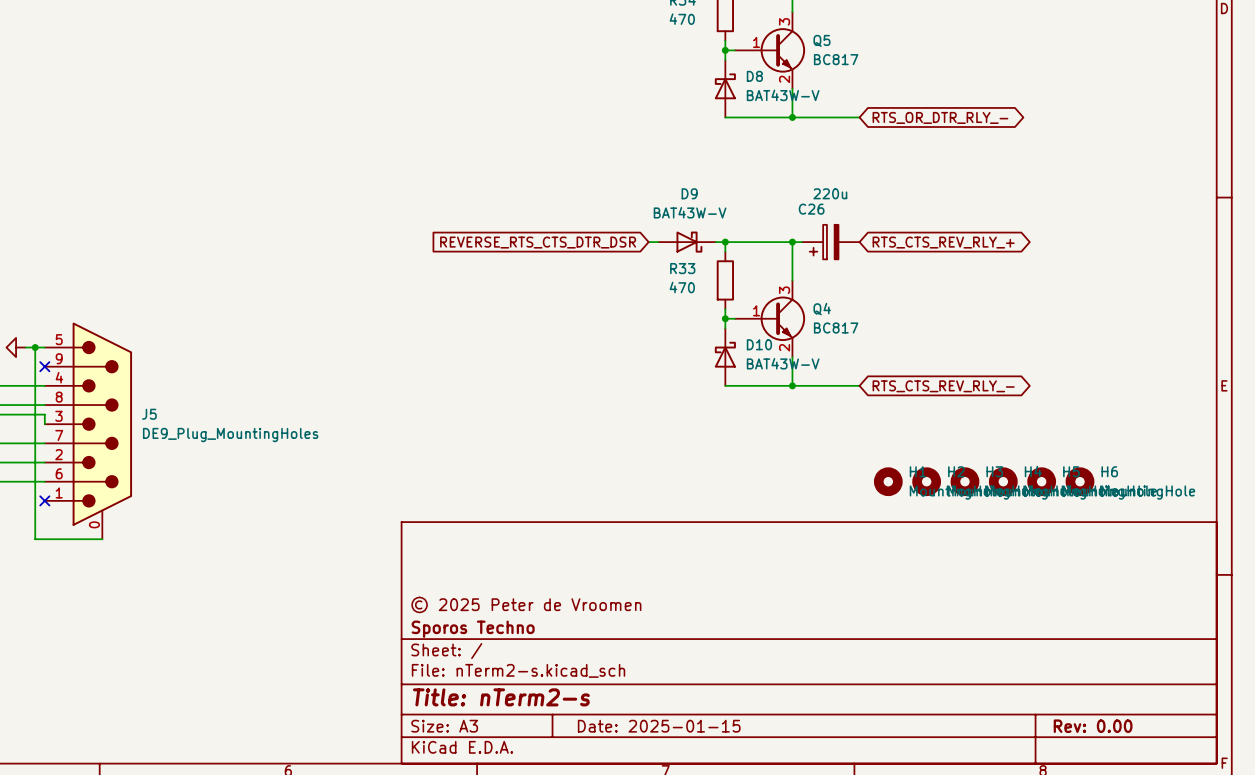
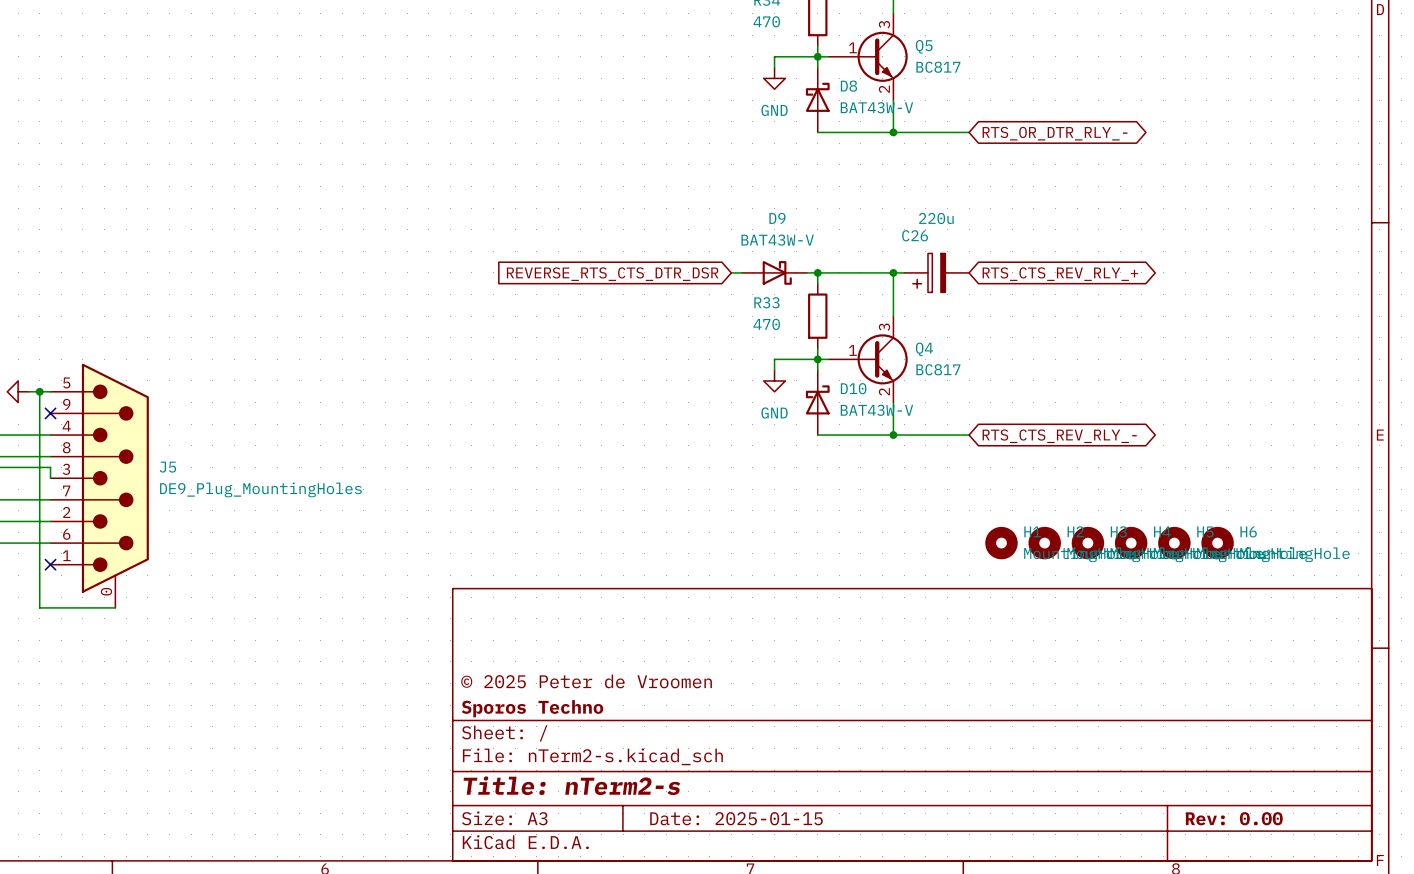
wire: none -> (817, 56) (774, 56) (774, 67)
power symbol: none -> GND (774, 78)
wire: none -> (817, 359) (774, 359) (774, 370)
power symbol: none -> GND (774, 380)

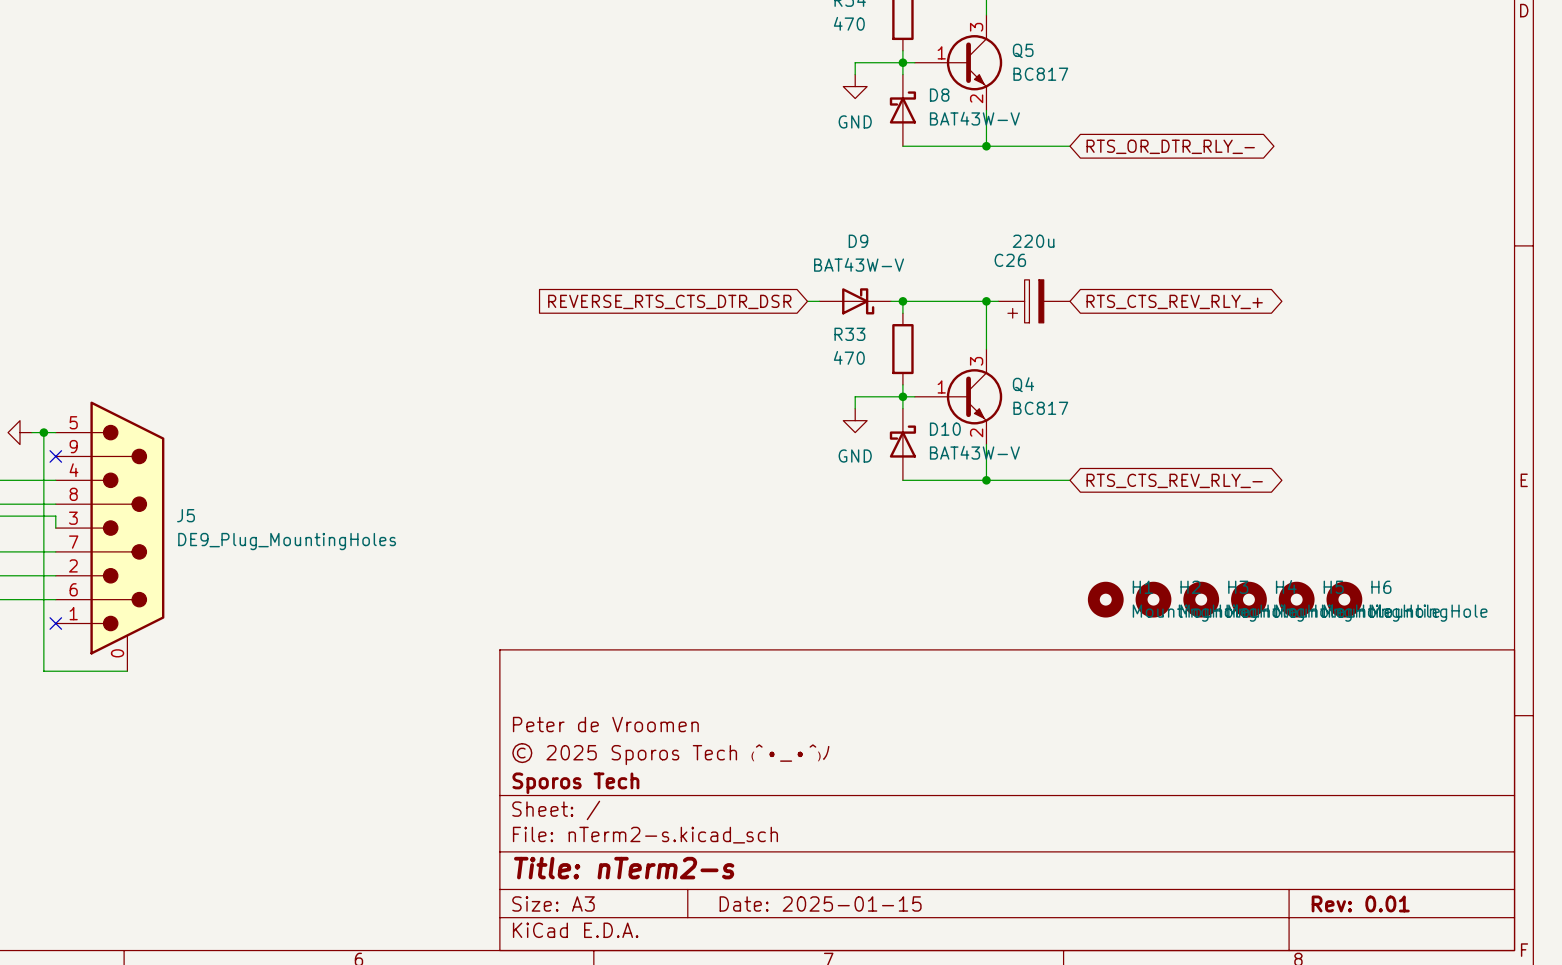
title block: none -> Peter de Vroomen (605, 724)
title block: © 2025 Peter de Vroomen (586, 681) -> © 2025 Sporos Tech ₍^•_•^₎ﾉ (671, 754)
title block: Sporos Techno (532, 708) -> Sporos Tech (575, 783)
title block: Rev: 0.00 (1234, 818) -> Rev: 0.01 (1360, 903)

